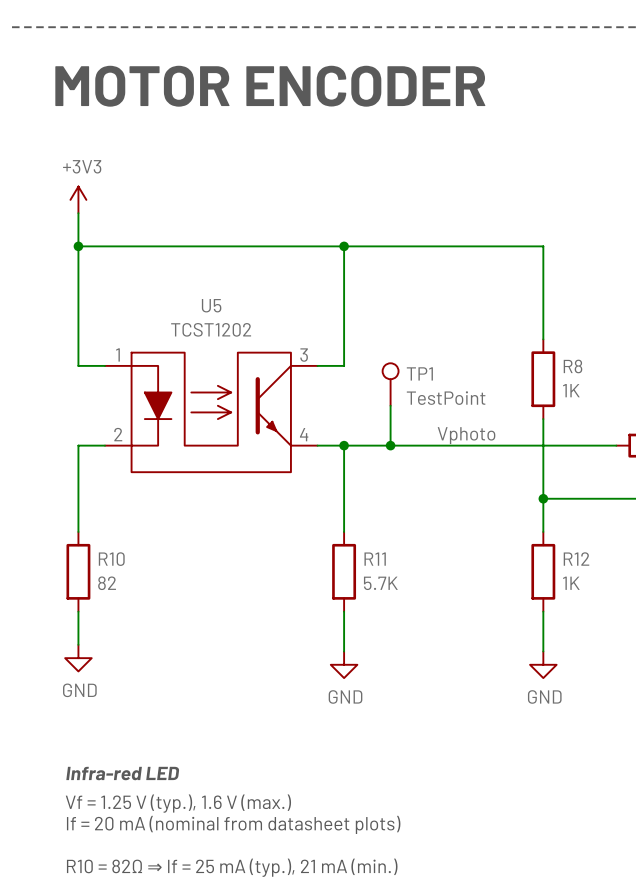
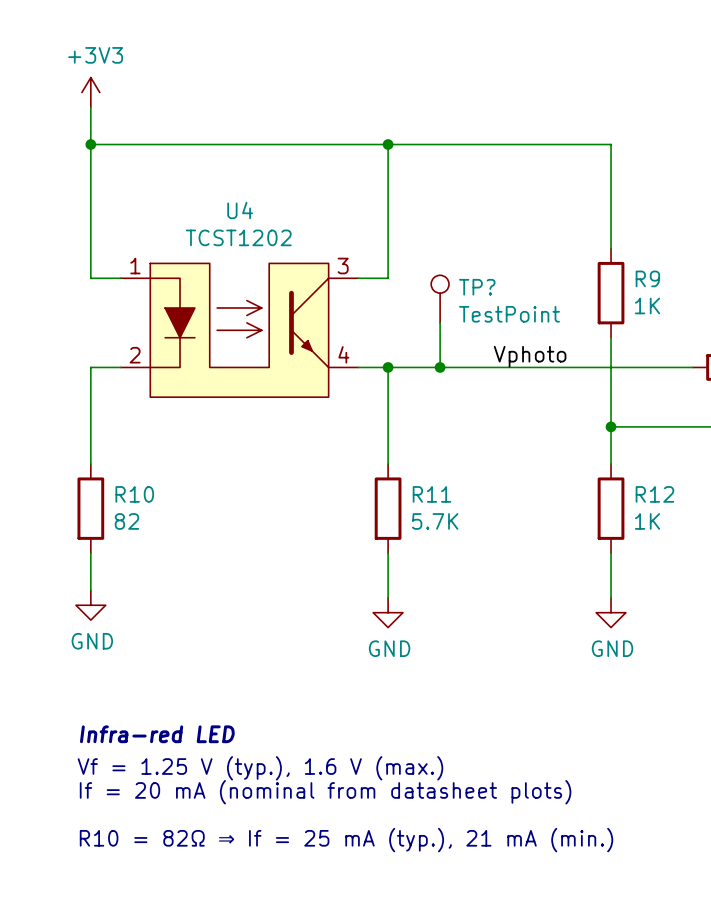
U5 name: U5 (211, 305) -> U4 (240, 210)
R8 name: R8 (572, 366) -> R9 (647, 278)
TP1 name: TP1 (419, 373) -> TP? (477, 287)

